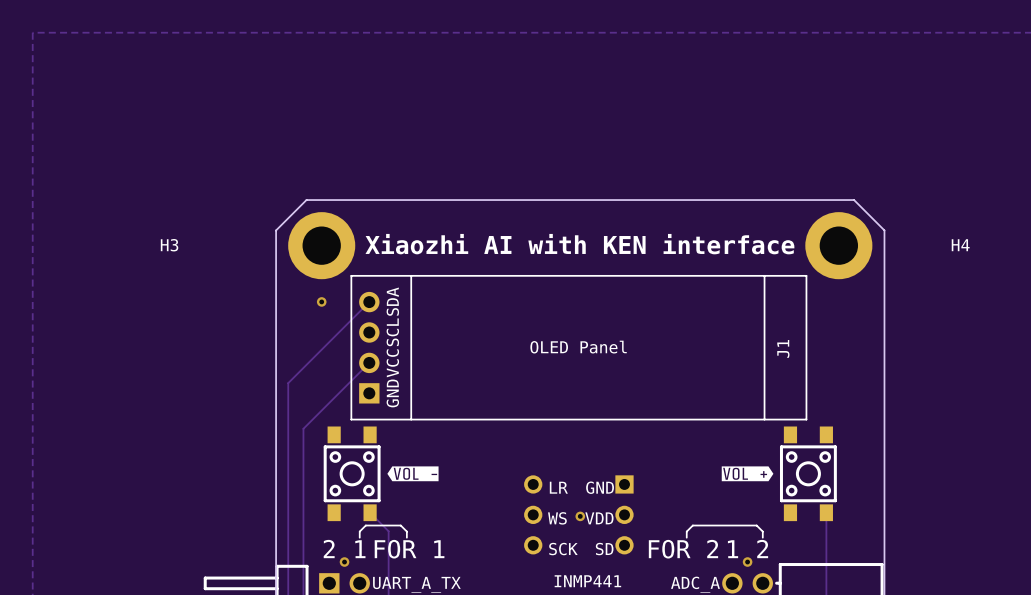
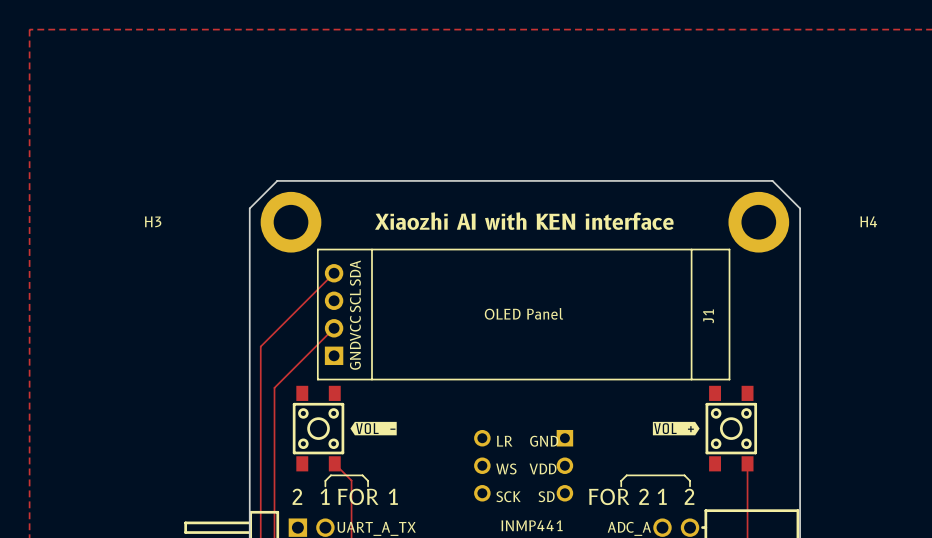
via: (321, 301) -> none
via: (580, 516) -> none
via: (344, 562) -> none
via: (747, 562) -> none

